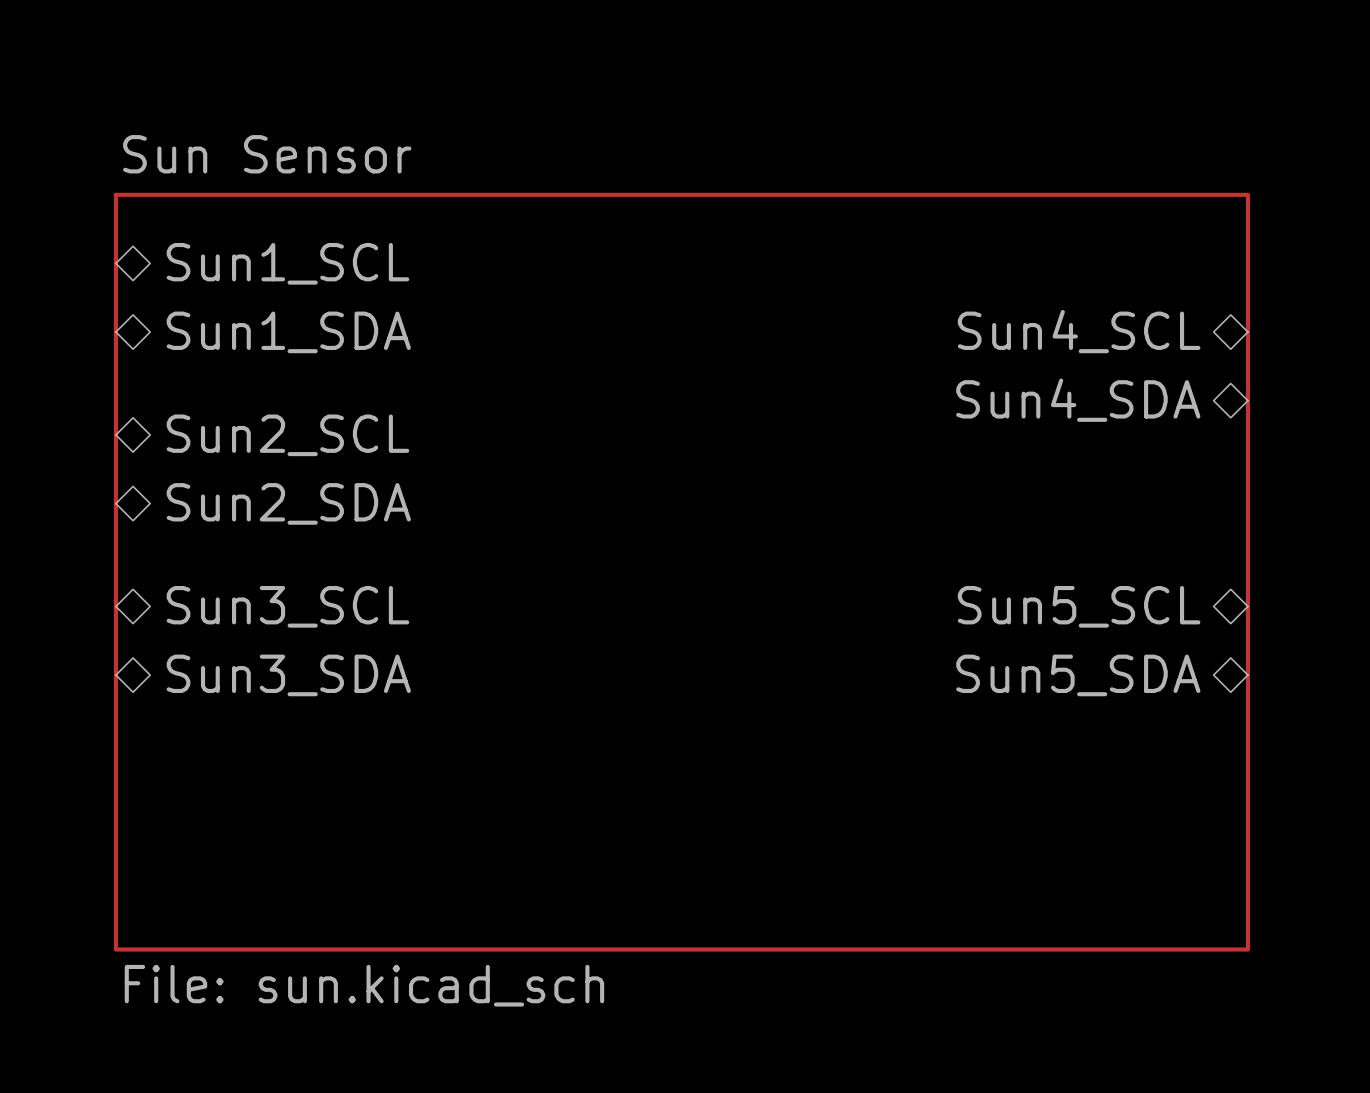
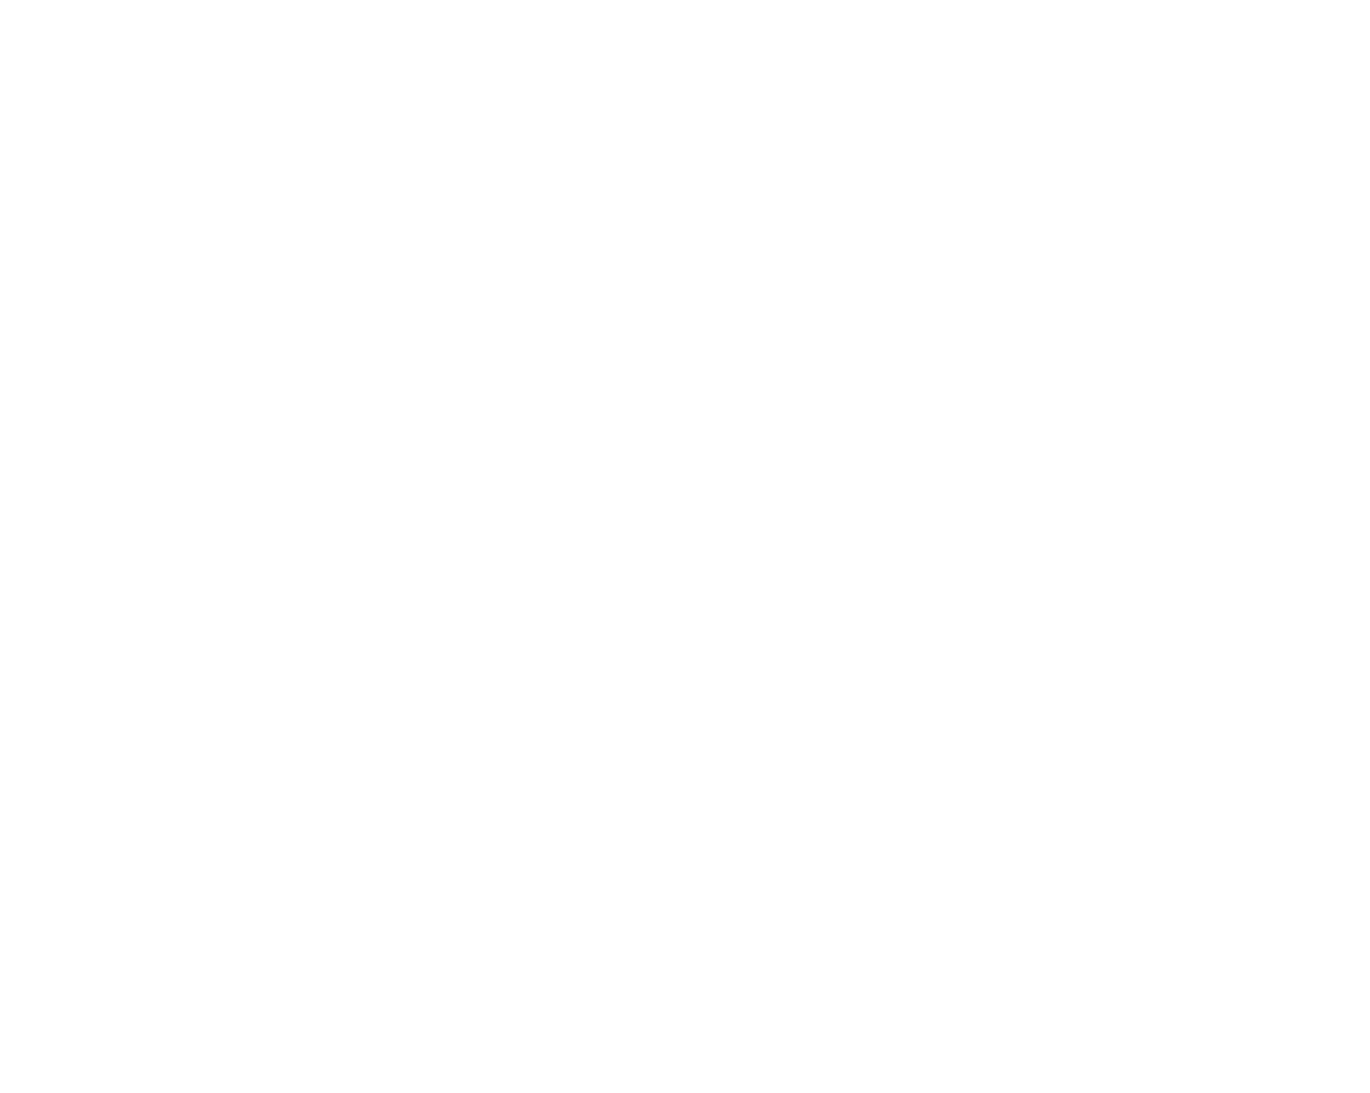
sheet pin: Sun1_SCL (287, 263) -> none
sheet pin: Sun4_SCL (1079, 331) -> none
sheet pin: Sun1_SDA (288, 332) -> none
sheet pin: Sun4_SDA (1078, 400) -> none
sheet pin: Sun2_SCL (287, 435) -> none
sheet pin: Sun2_SDA (288, 503) -> none
sheet Sun Sensor: File: sun.kicad_sch (681, 572) -> none
sheet pin: Sun3_SCL (287, 606) -> none
sheet pin: Sun5_SCL (1079, 606) -> none
sheet pin: Sun3_SDA (288, 675) -> none
sheet pin: Sun5_SDA (1078, 675) -> none

